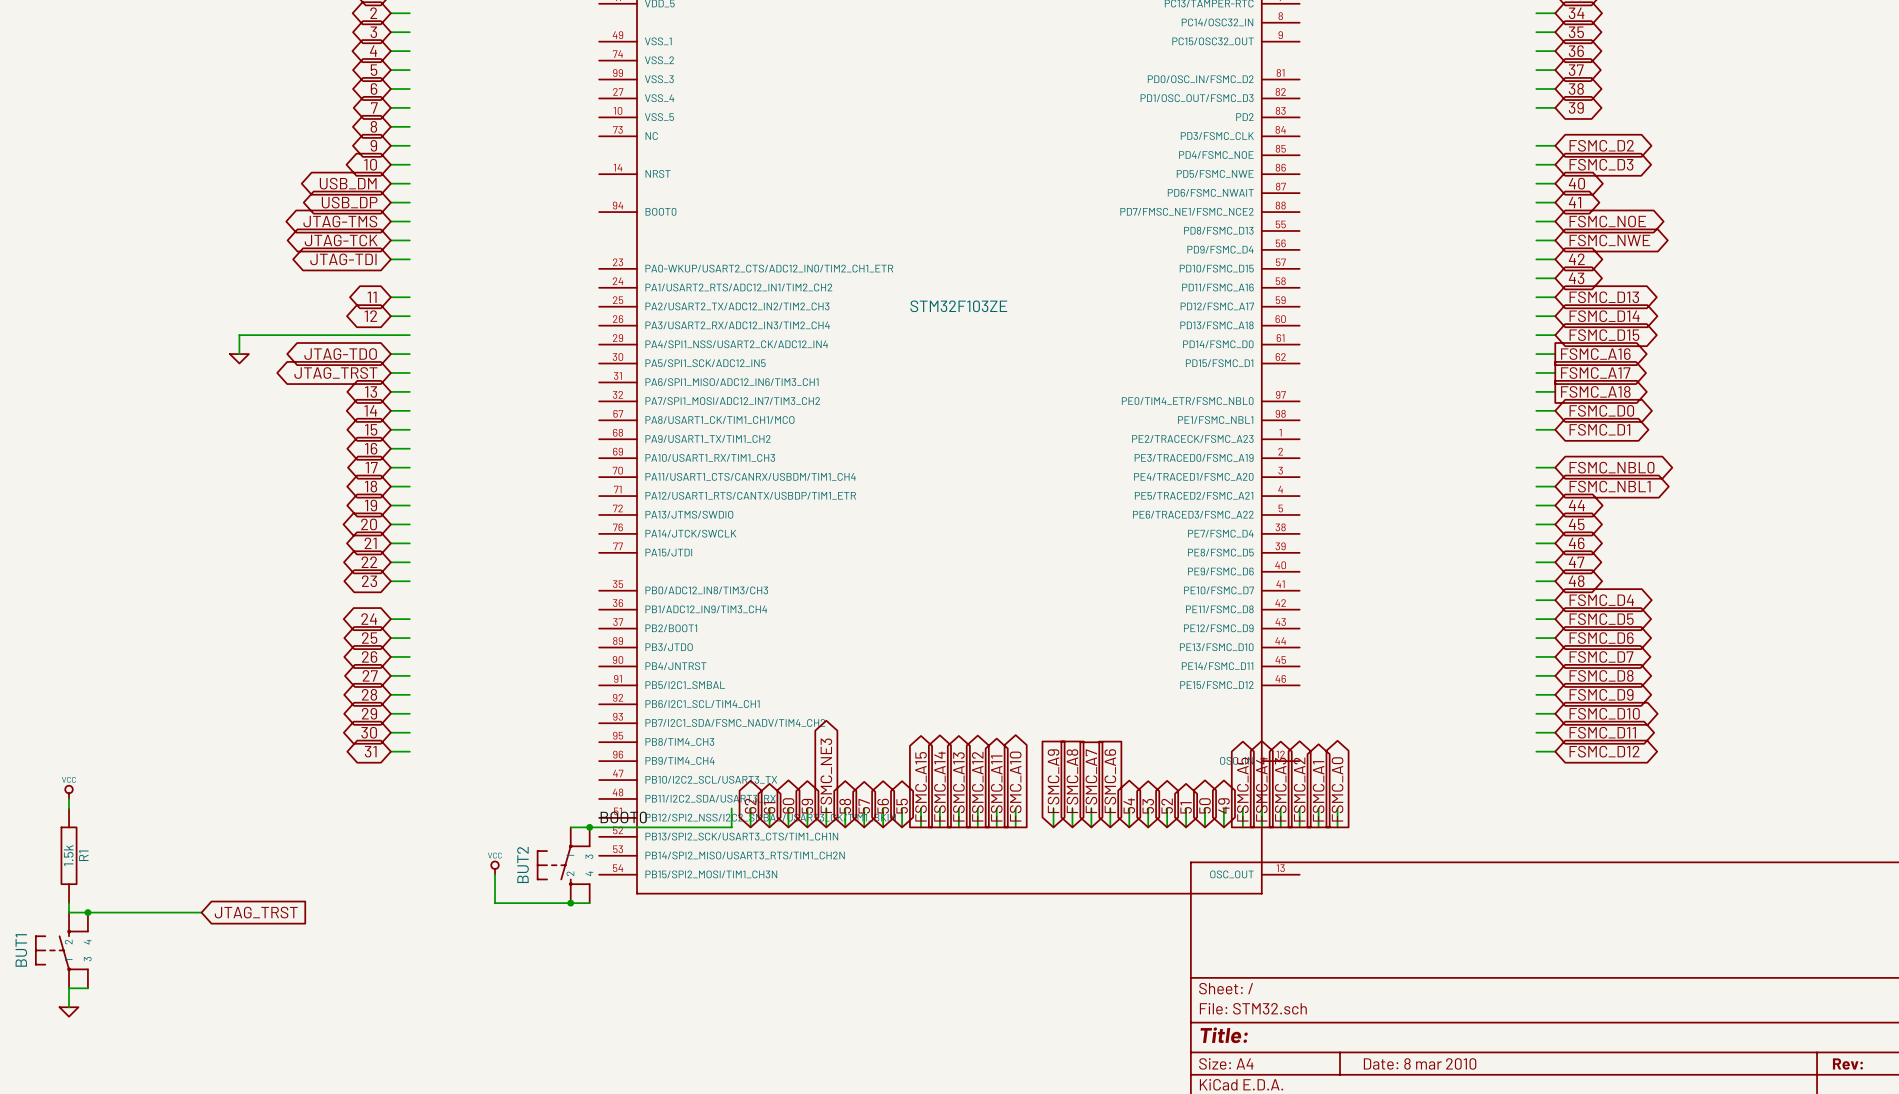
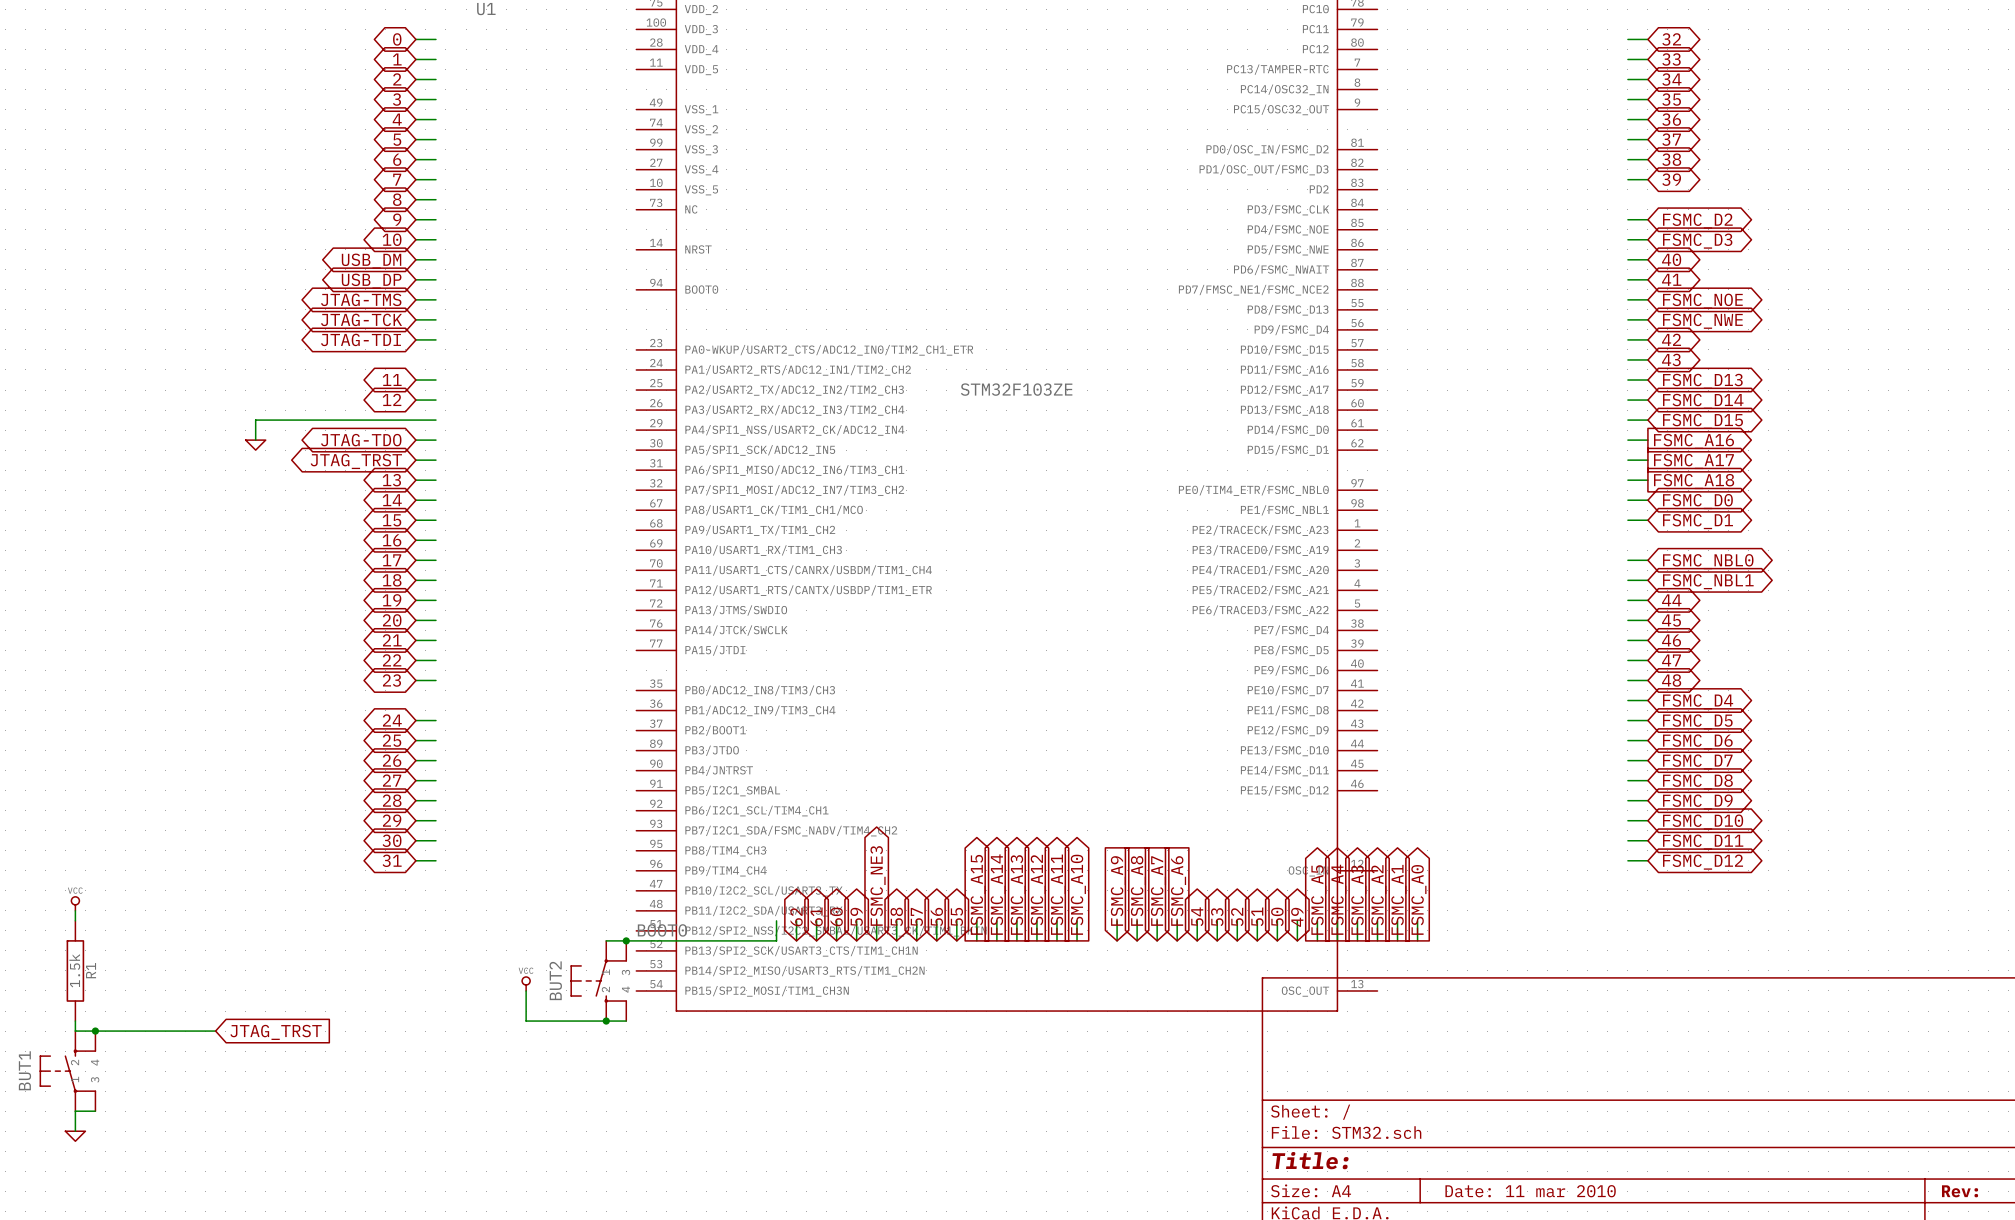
title block: Date: 8 mar 2010 (1420, 1063) -> Date: 11 mar 2010 (1530, 1191)

